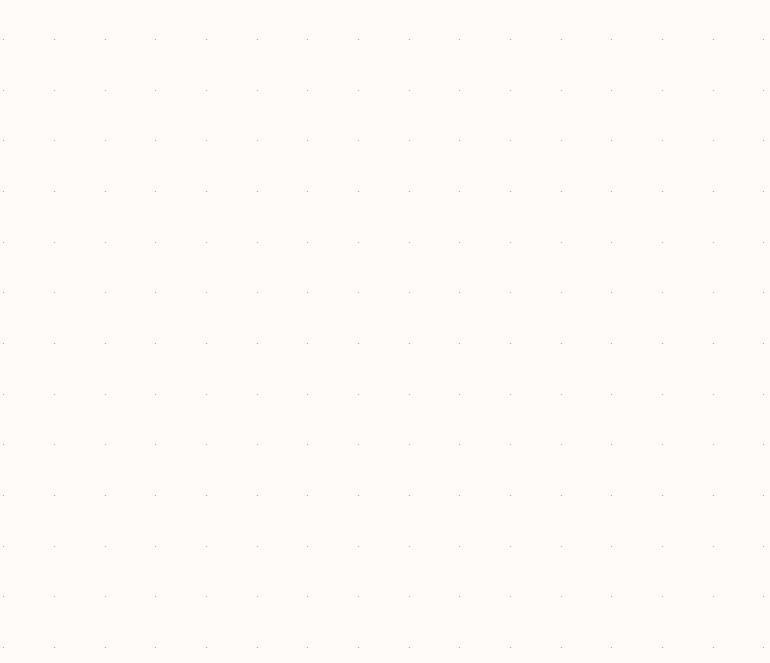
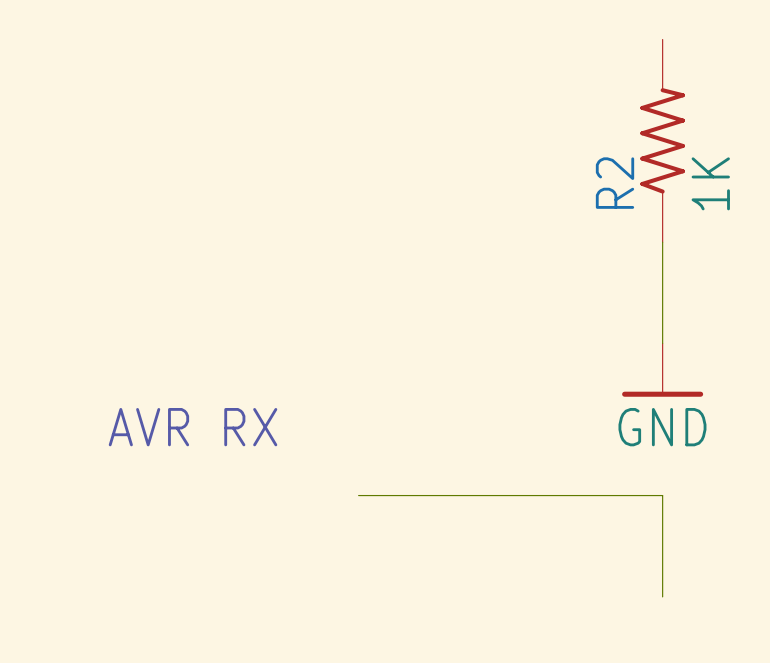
R2: none -> 1K (662, 140)
wire: none -> (662, 242) (662, 343)
power symbol: none -> GND (662, 370)
text: none -> AVR RX (193, 427)
wire: none -> (358, 495) (662, 495) (662, 596)

